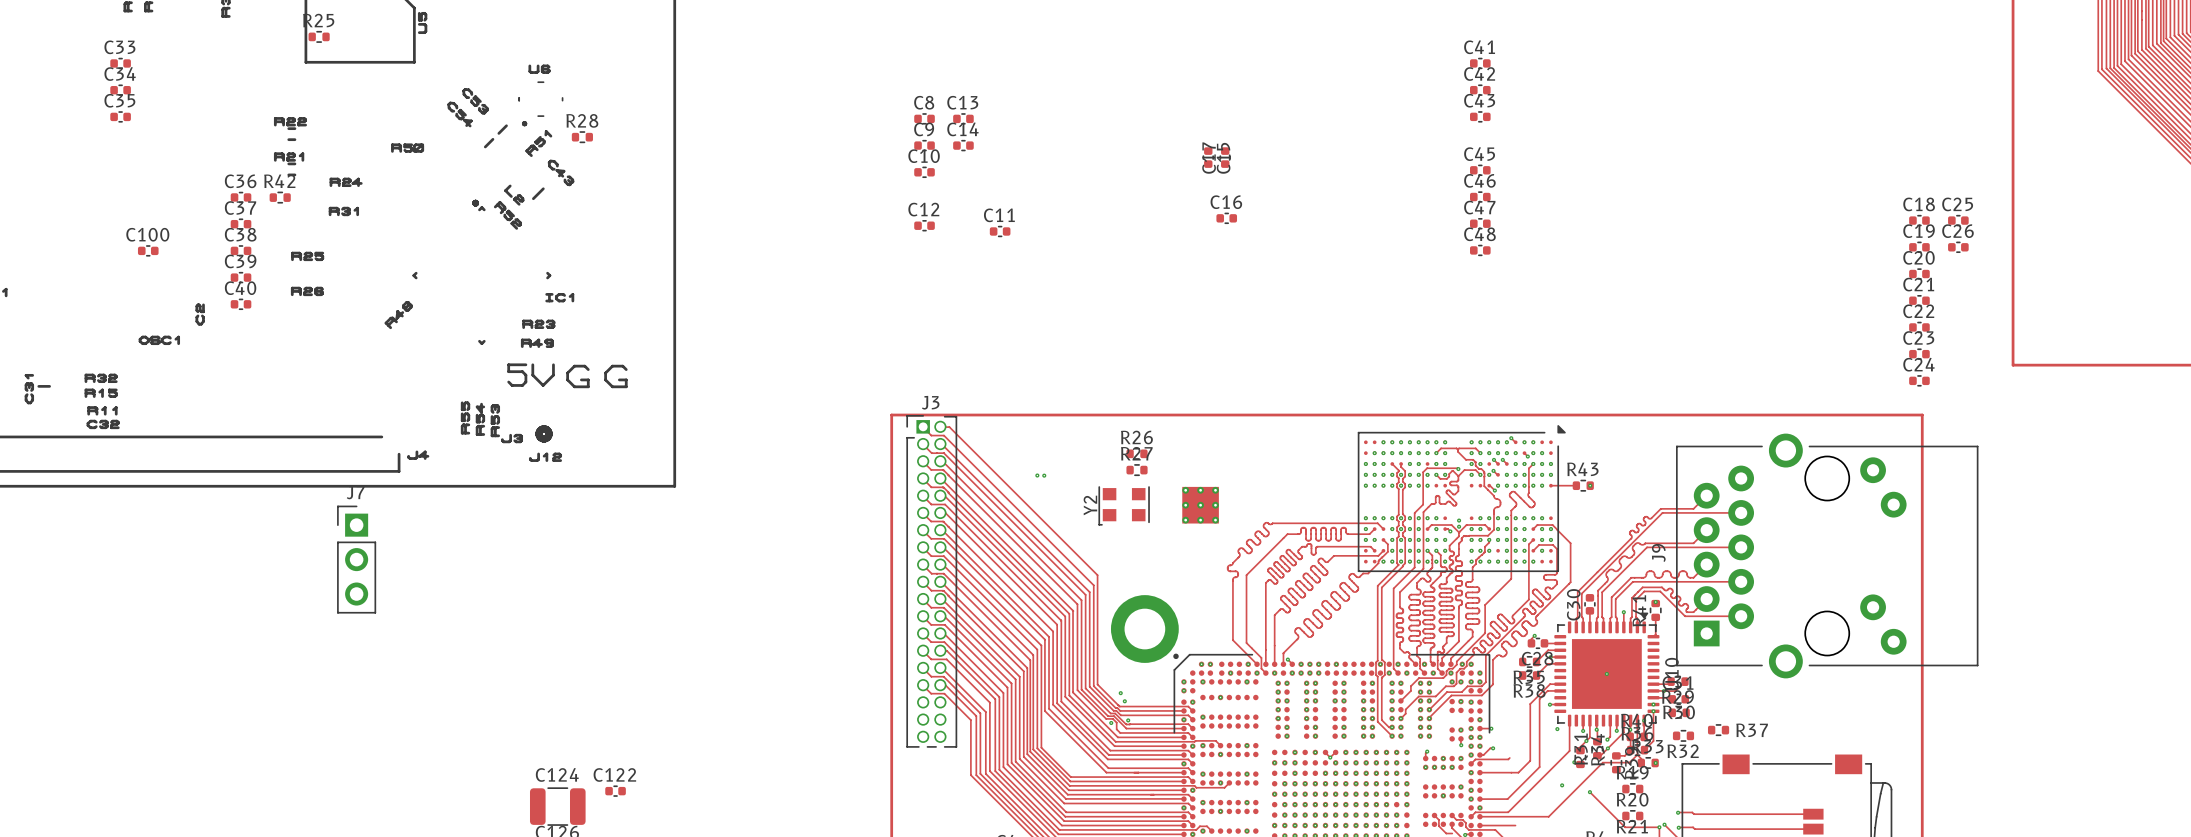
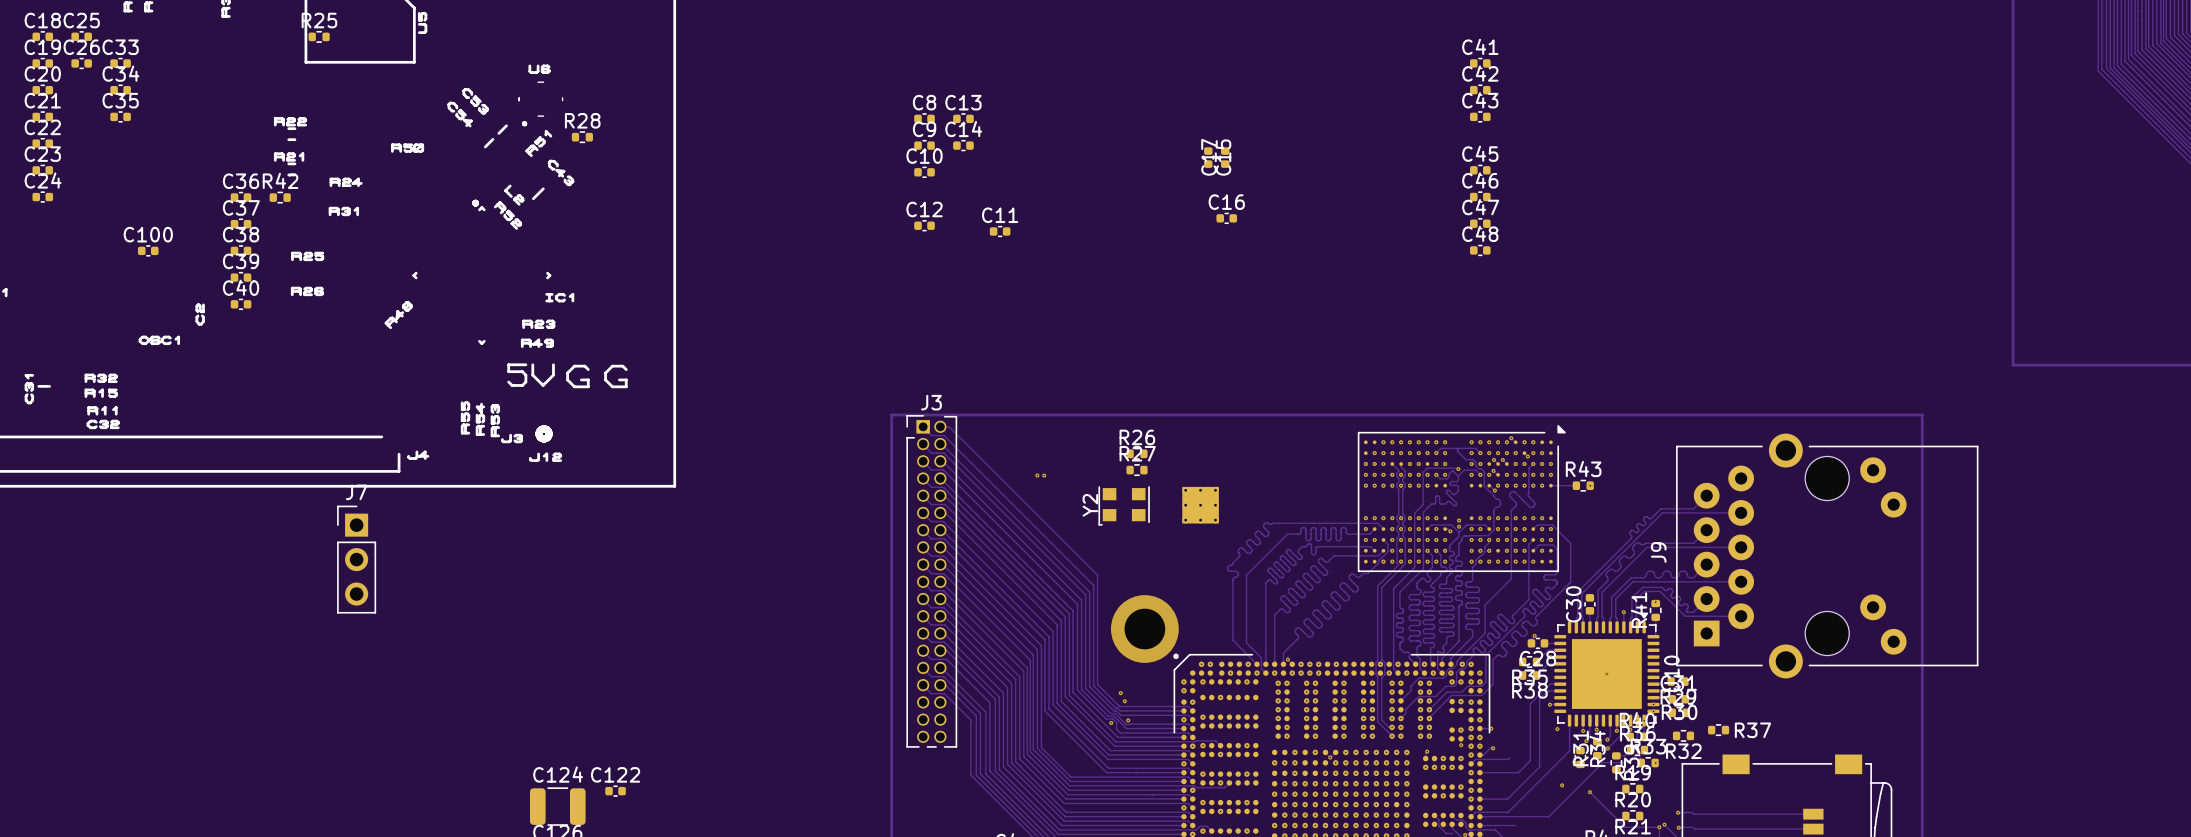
C18 position: (1919, 220) -> (42, 36)
C25 position: (1958, 220) -> (81, 36)
C19 position: (1919, 247) -> (42, 63)
C26 position: (1958, 247) -> (81, 63)
C20 position: (1919, 274) -> (42, 90)
C21 position: (1919, 300) -> (42, 116)
C22 position: (1919, 327) -> (42, 143)
C23 position: (1919, 354) -> (42, 170)
C24 position: (1919, 380) -> (42, 197)

